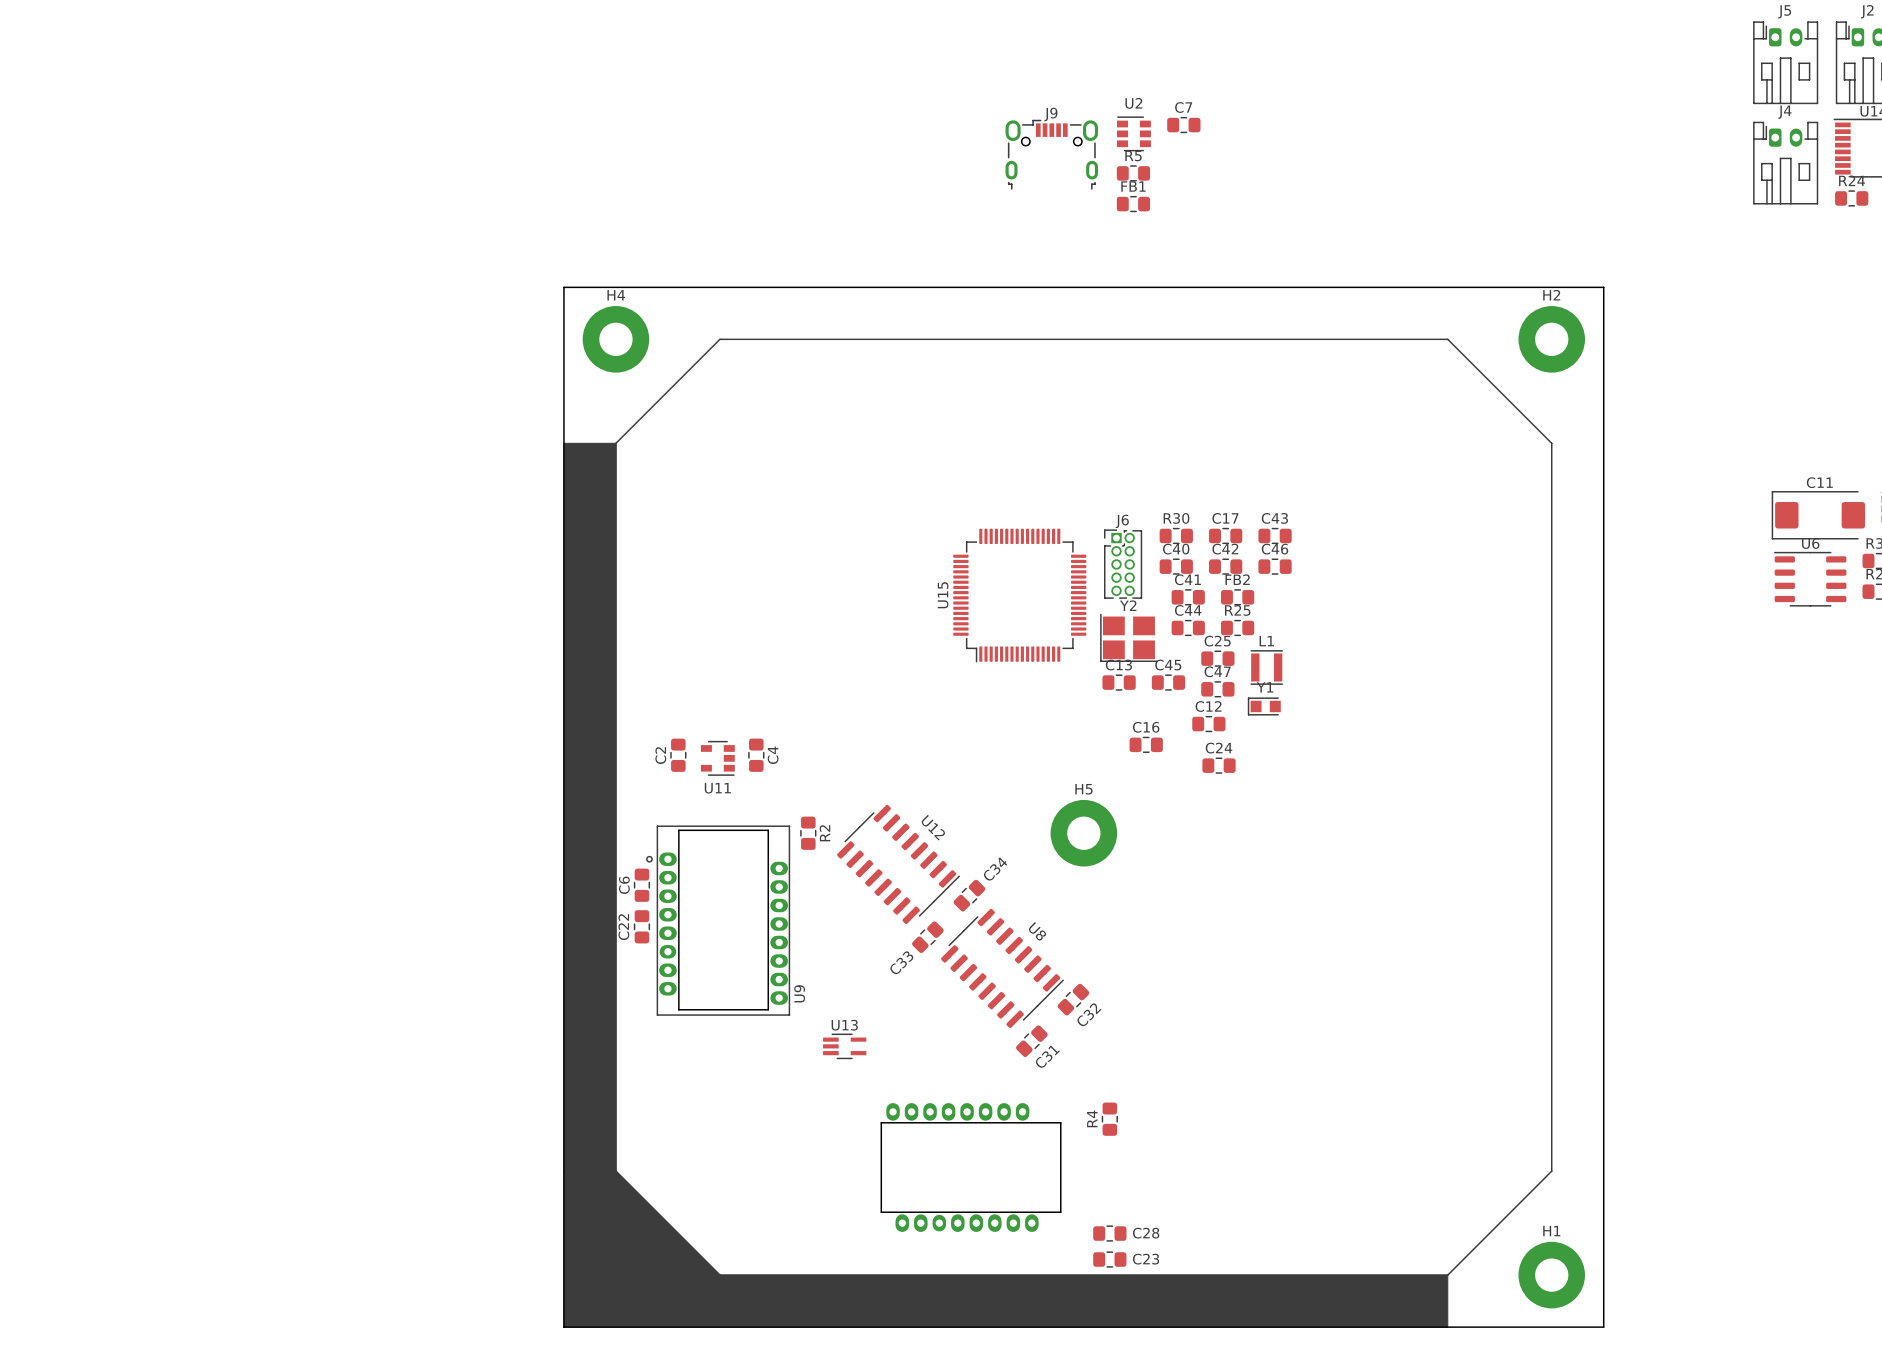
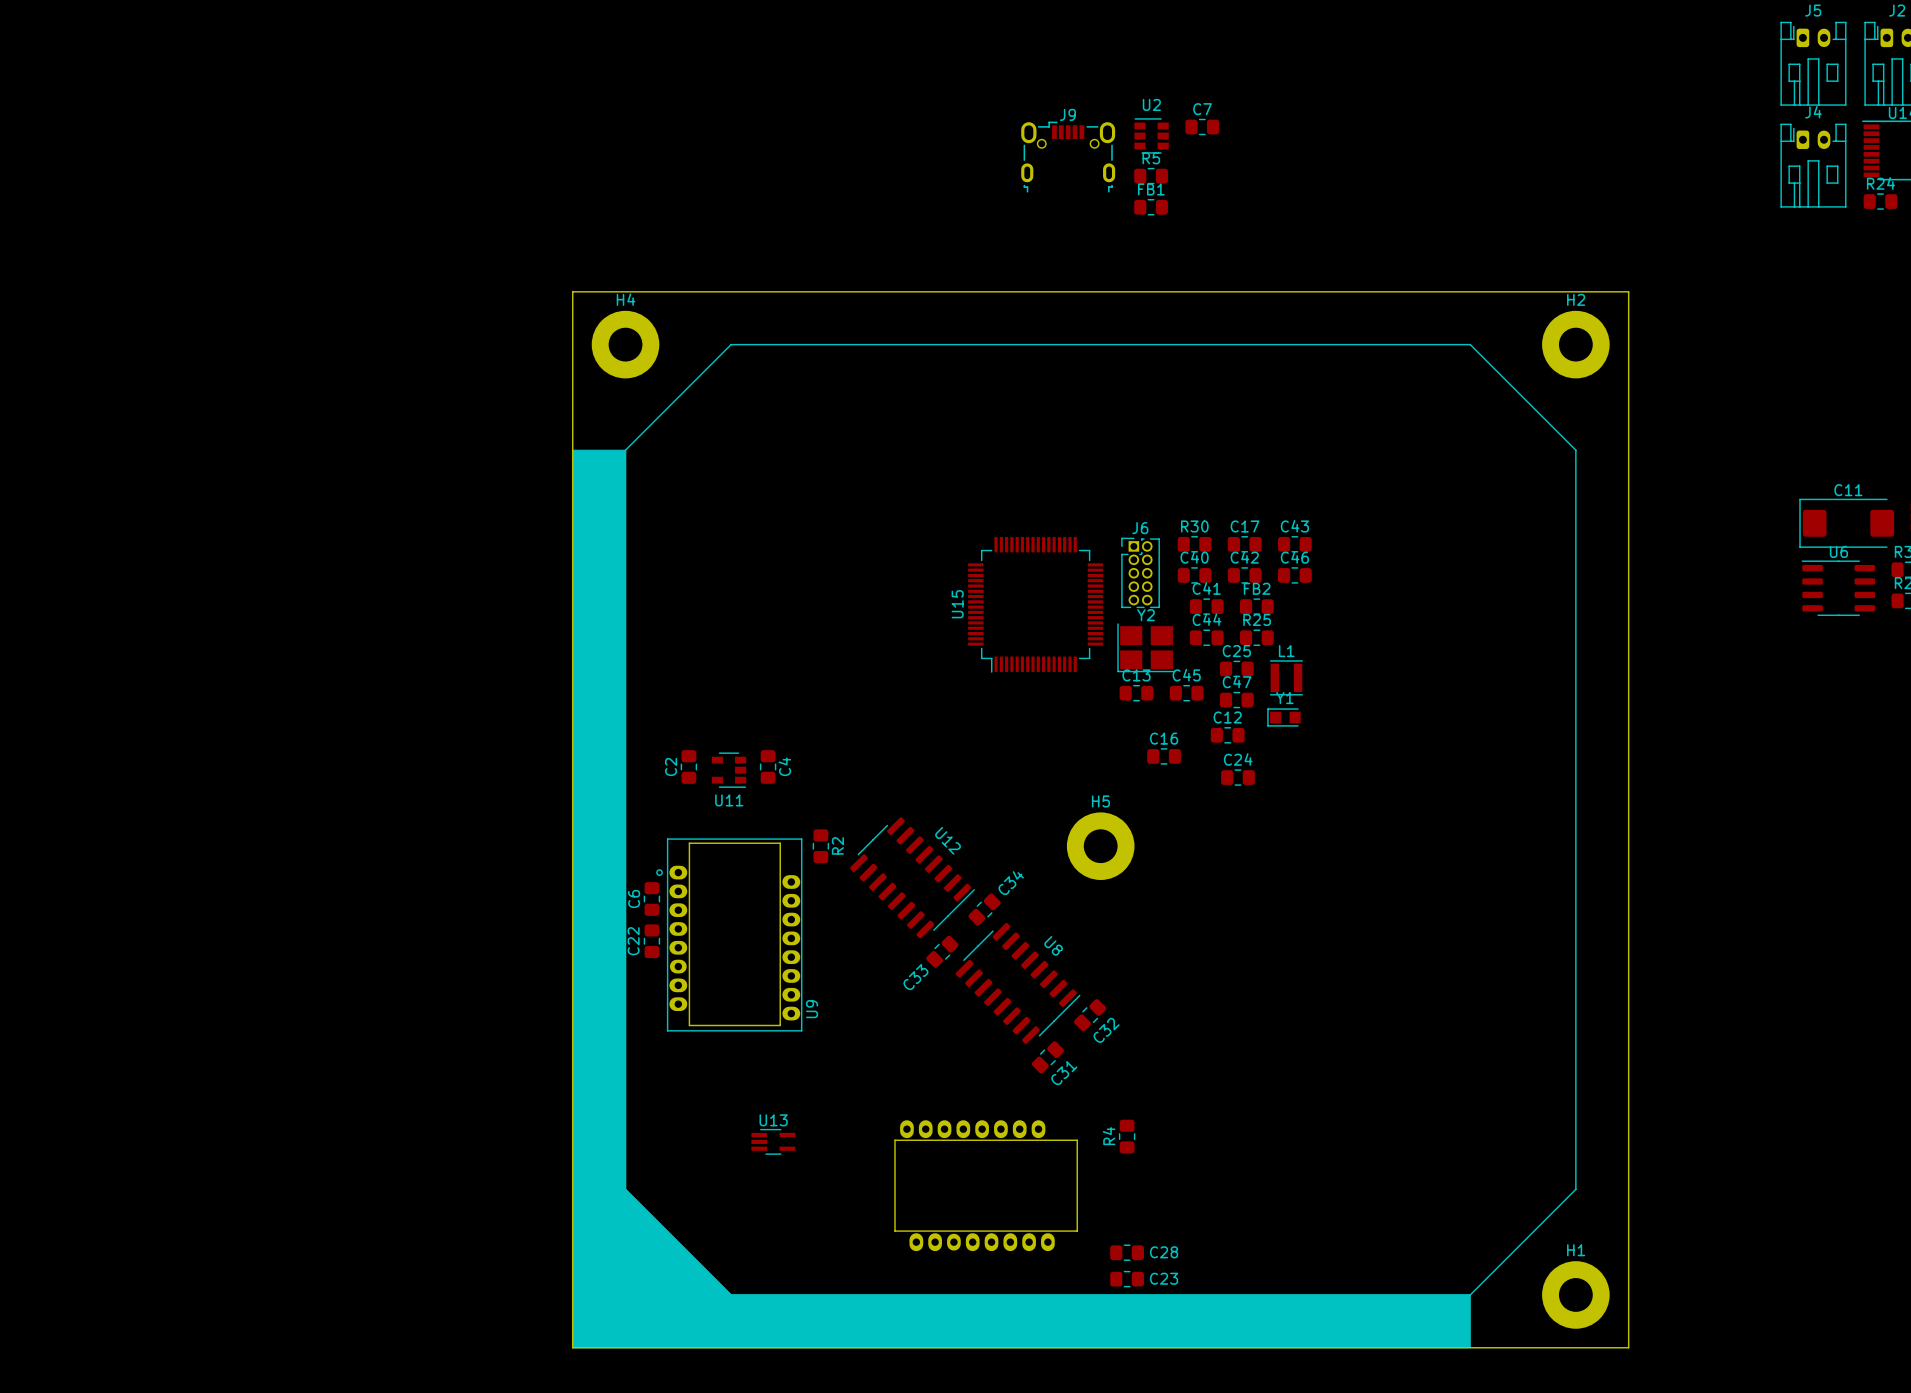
U13 position: (844, 1046) -> (773, 1141)

